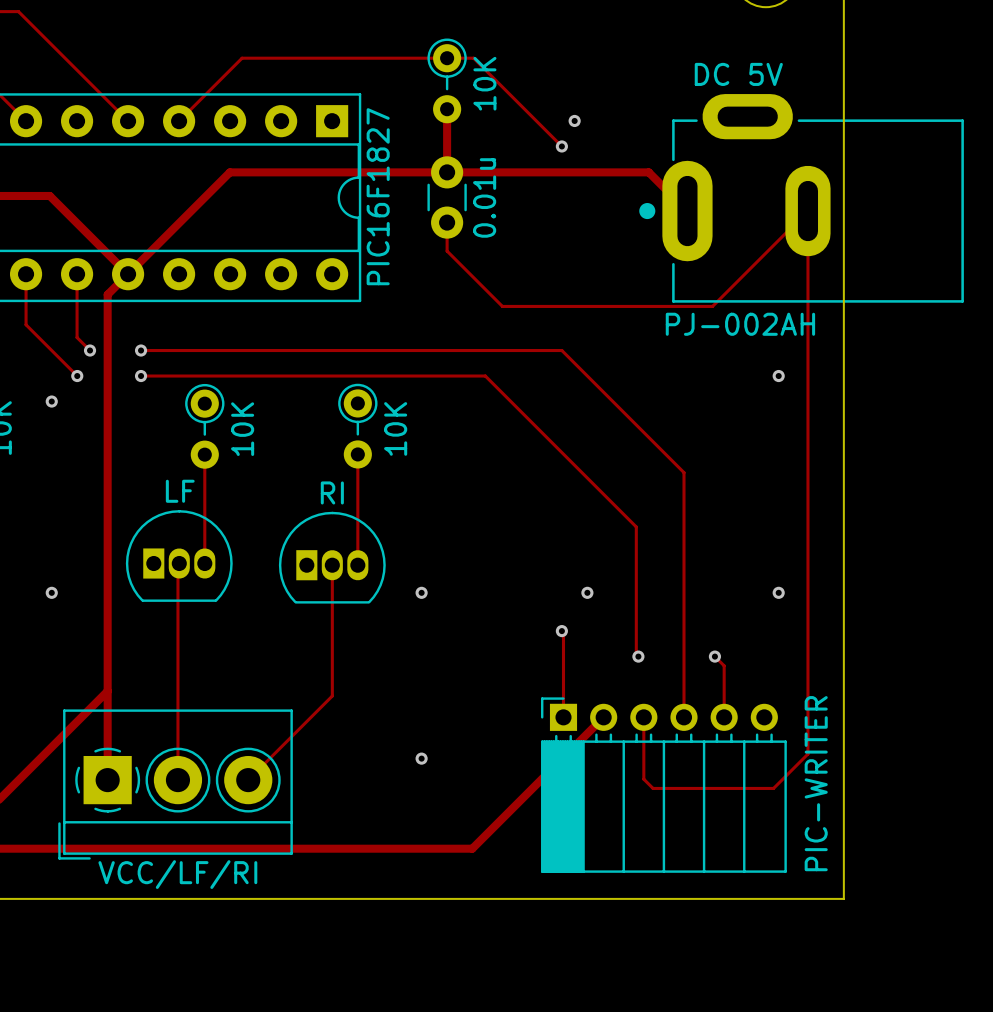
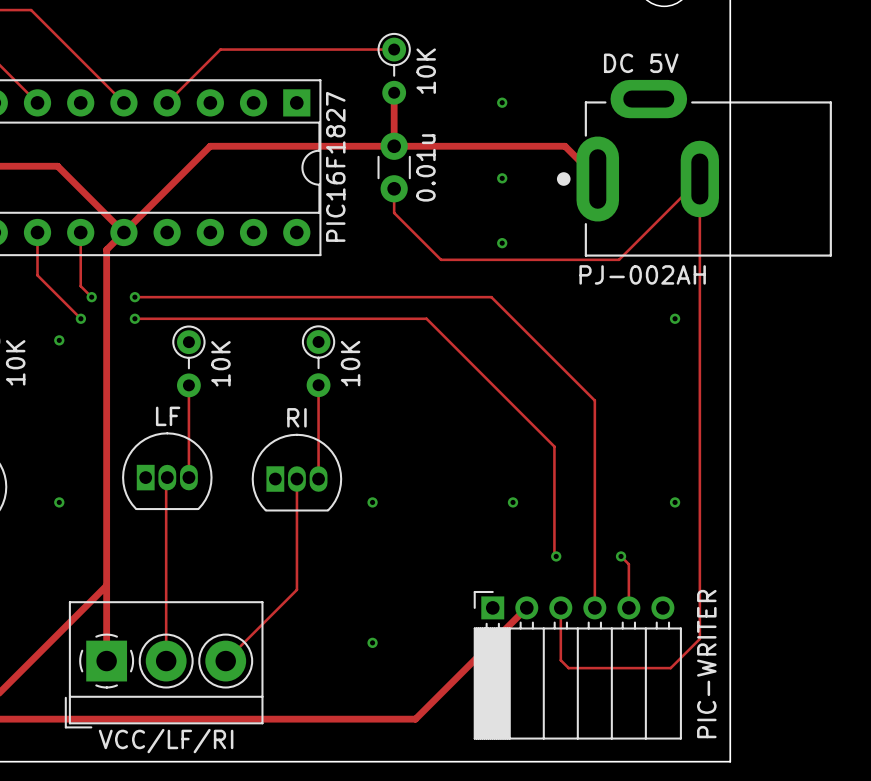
track: (447, 58) (473, 58) (561, 146) -> none
via position: (561, 146) -> (502, 178)
via: none -> (502, 243)
track: (561, 631) (563, 632) (563, 717) -> none
via: (561, 631) -> none

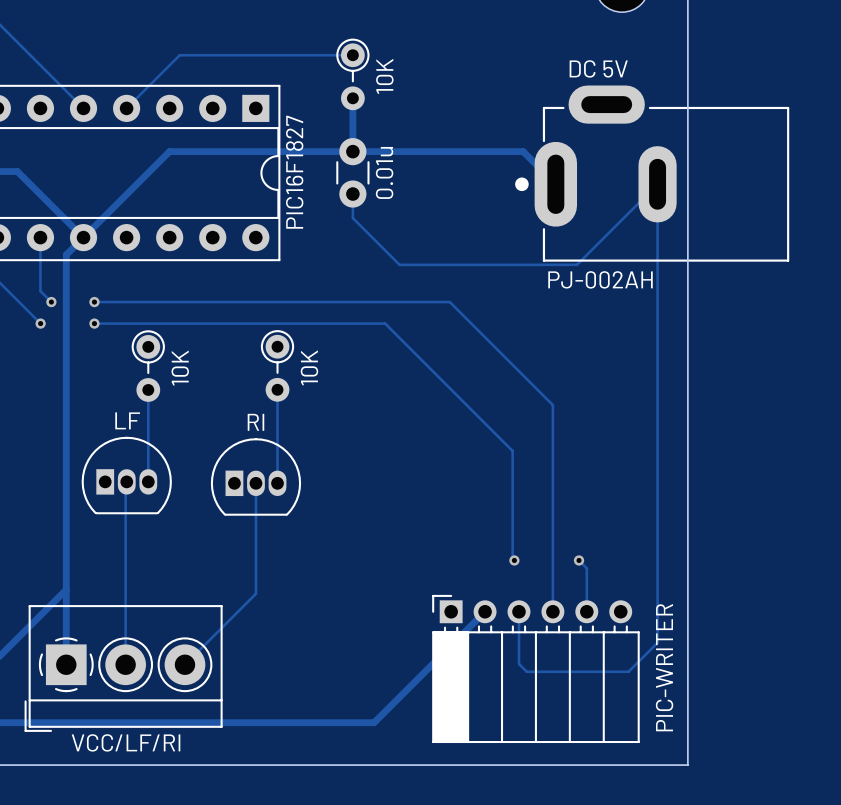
via: (502, 102) -> none
via: (502, 178) -> none
via: (502, 243) -> none
via: (675, 318) -> none
via: (59, 340) -> none
via: (59, 502) -> none
via: (372, 502) -> none
via: (513, 502) -> none
via: (675, 502) -> none
via: (372, 642) -> none

